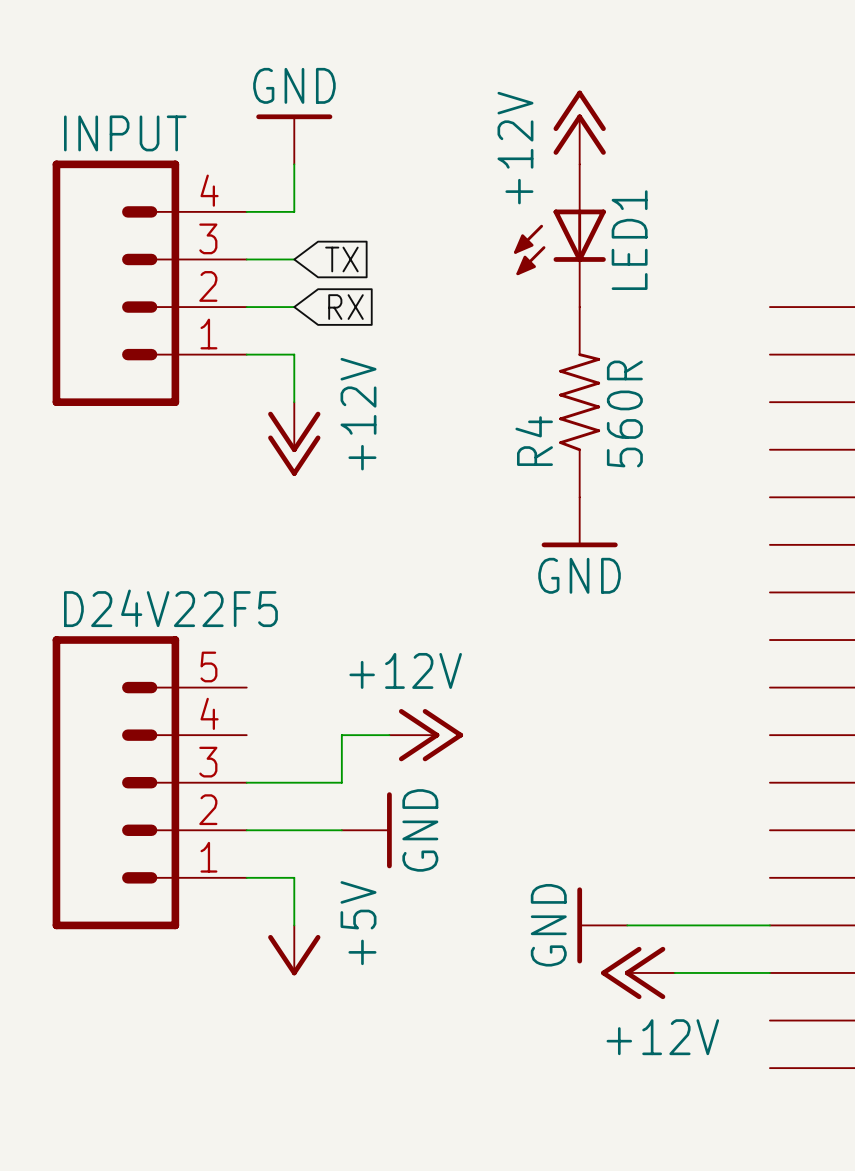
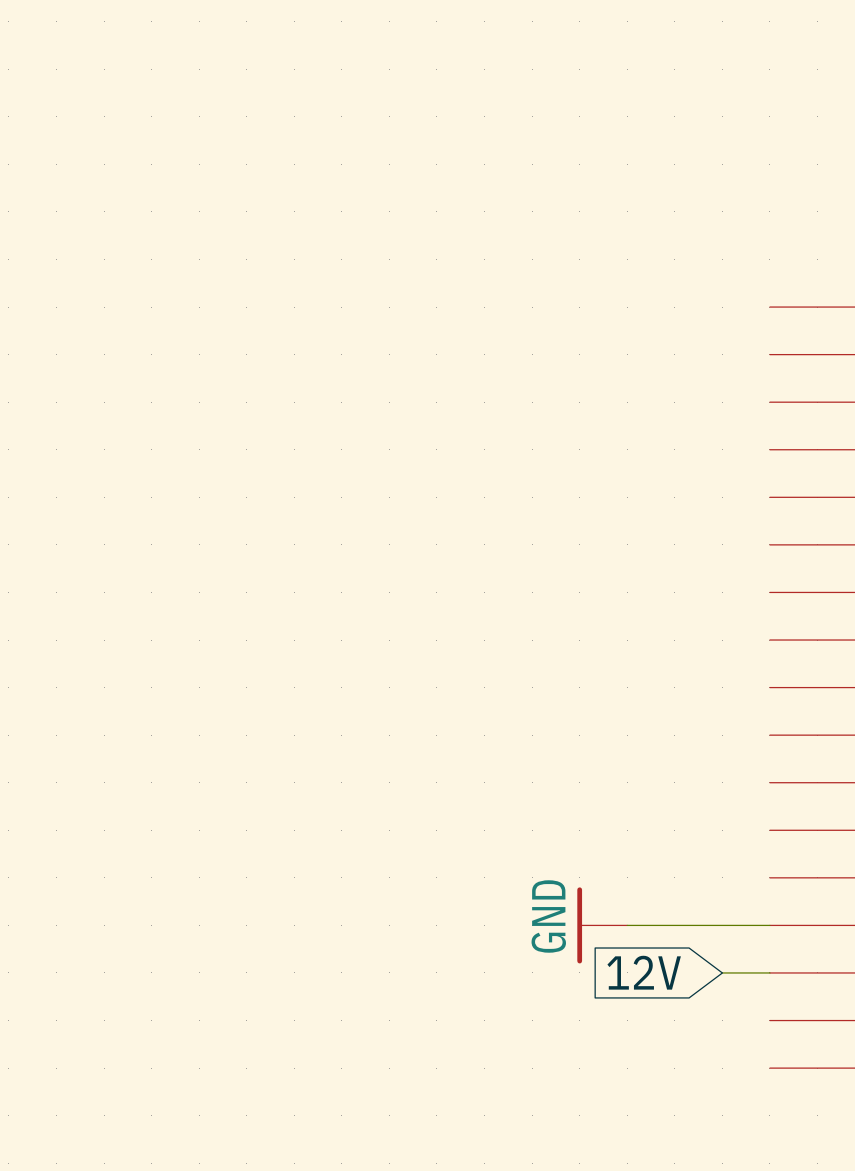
power symbol: +12V (579, 127) -> none
power symbol: GND (294, 139) -> none
wire: (294, 164) (294, 211) (246, 211) -> none
LED1: (559, 235) -> none
wire: (246, 259) (294, 259) -> none
global label: TX (341, 259) -> none
INPUT: (149, 283) -> none
wire: (246, 307) (294, 307) -> none
global label: RX (345, 307) -> none
wire: (246, 354) (294, 354) (294, 402) -> none
R4: 560R (579, 402) -> none
power symbol: +12V (294, 439) -> none
power symbol: GND (579, 522) -> none
wire: (389, 735) (341, 735) (341, 782) (246, 782) -> none
power symbol: +12V (426, 735) -> none
D24V22F5: (149, 782) -> none
wire: (246, 830) (341, 830) -> none
power symbol: GND (366, 830) -> none
wire: (246, 877) (294, 877) (294, 925) -> none
power symbol: +5V (294, 950) -> none
power symbol: +12V (637, 972) -> none
global label: none -> 12V (644, 972)
wire: (674, 972) (722, 972) -> none

